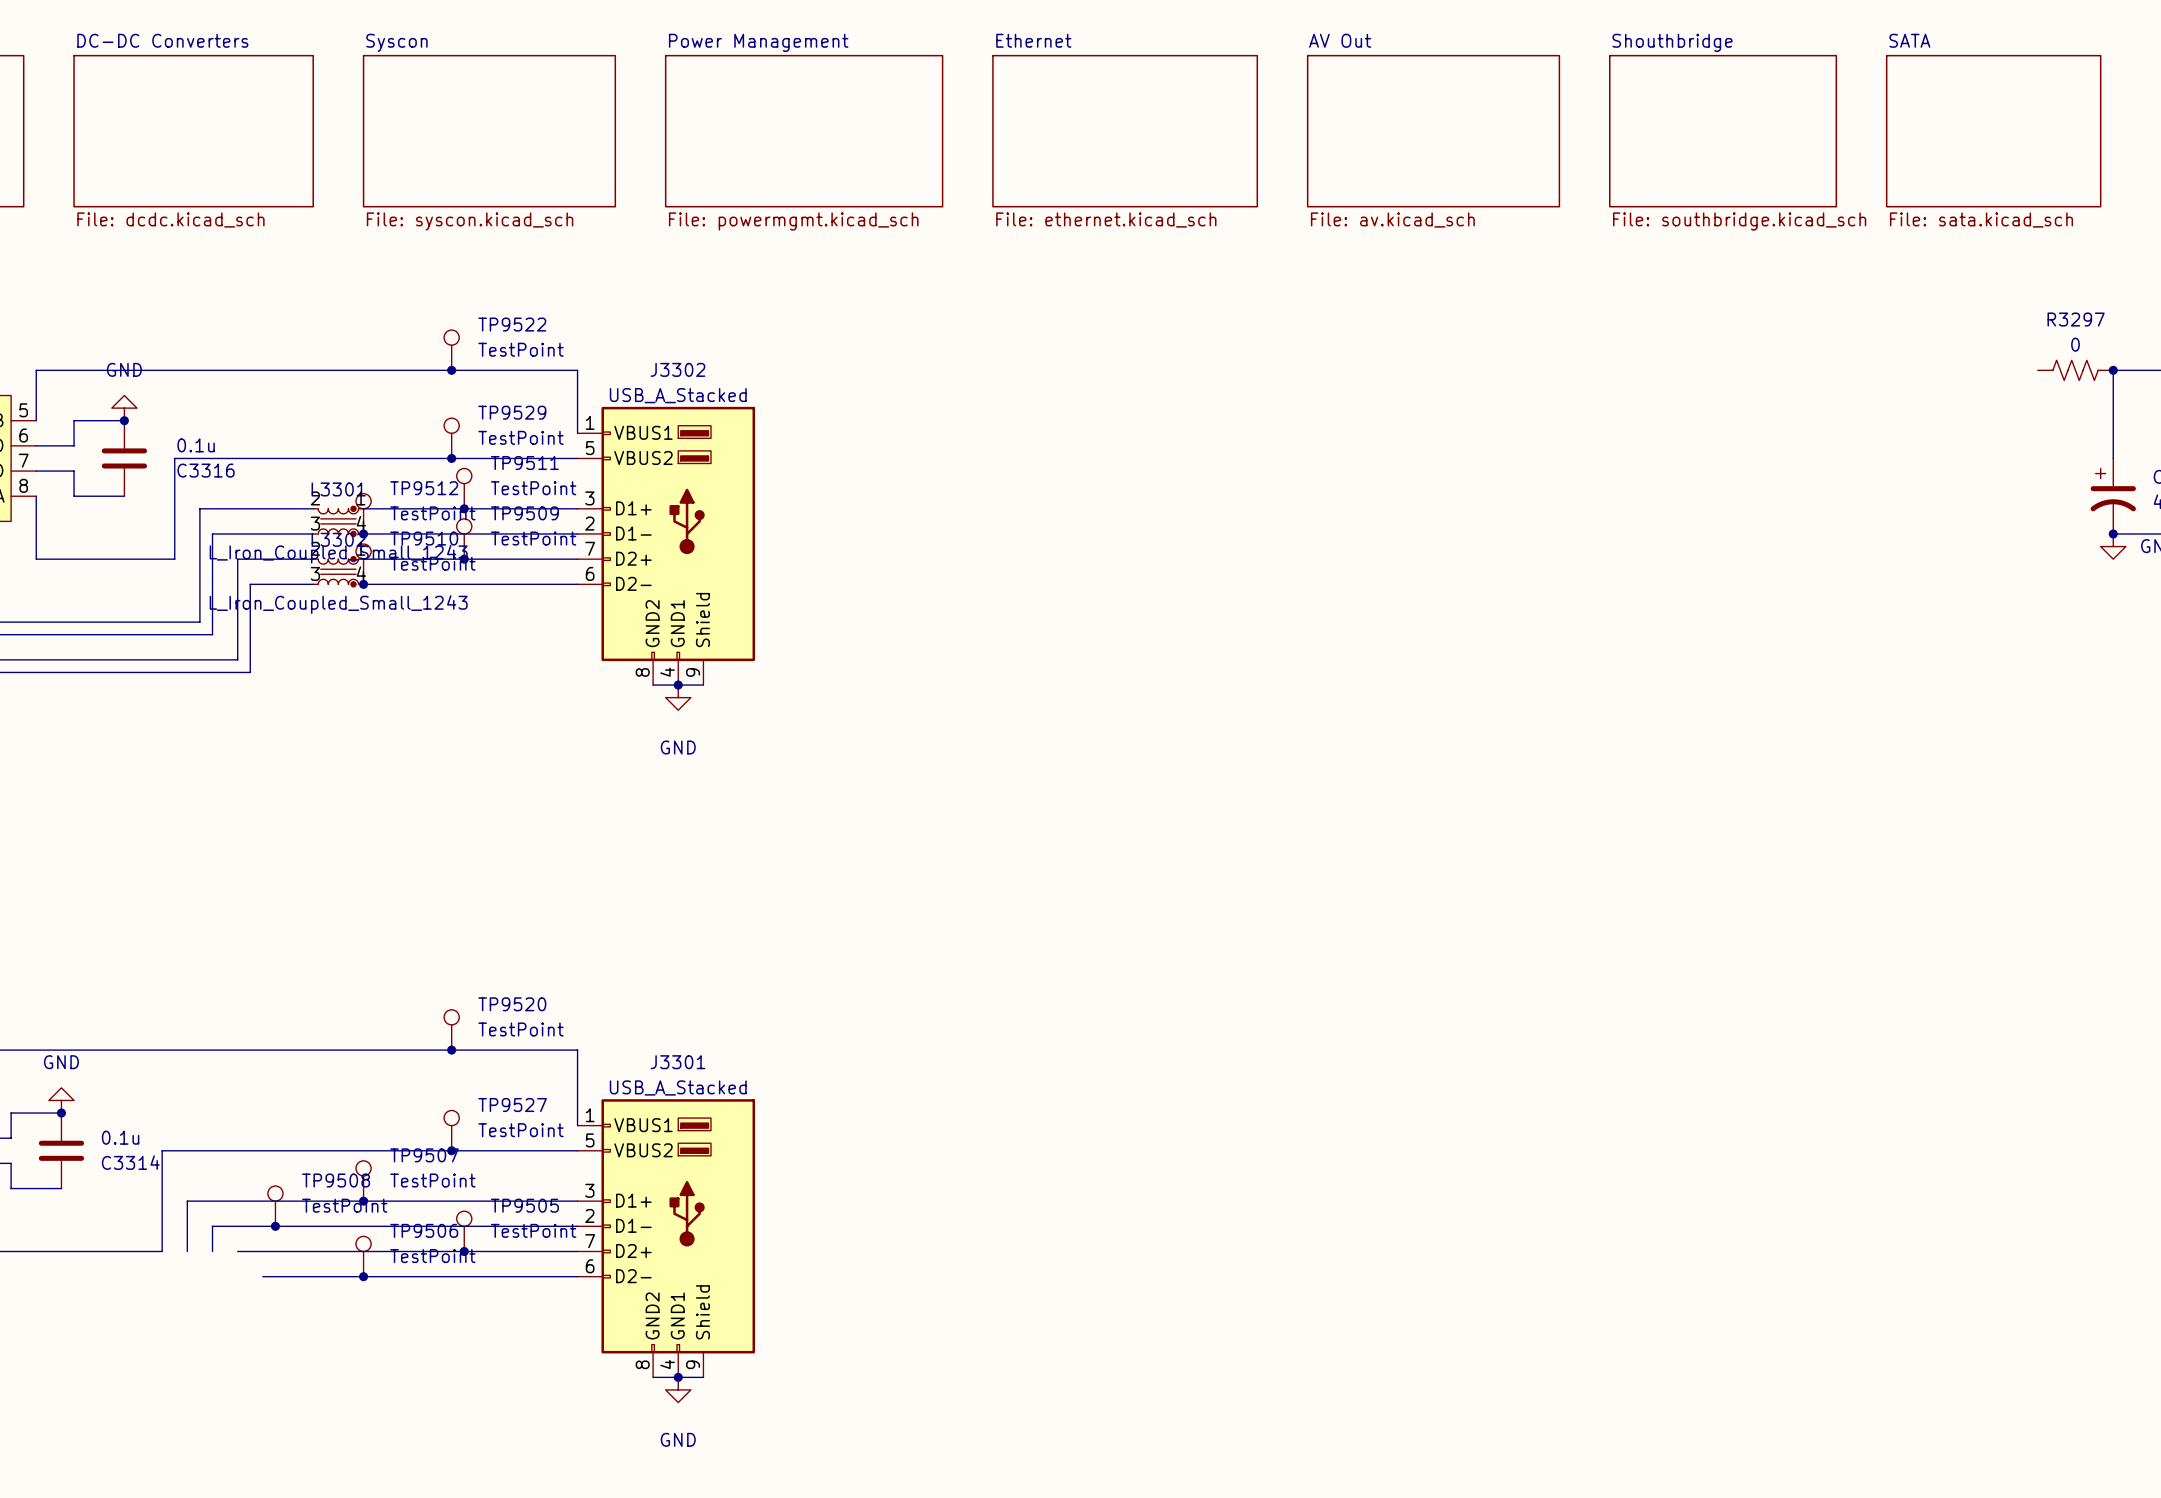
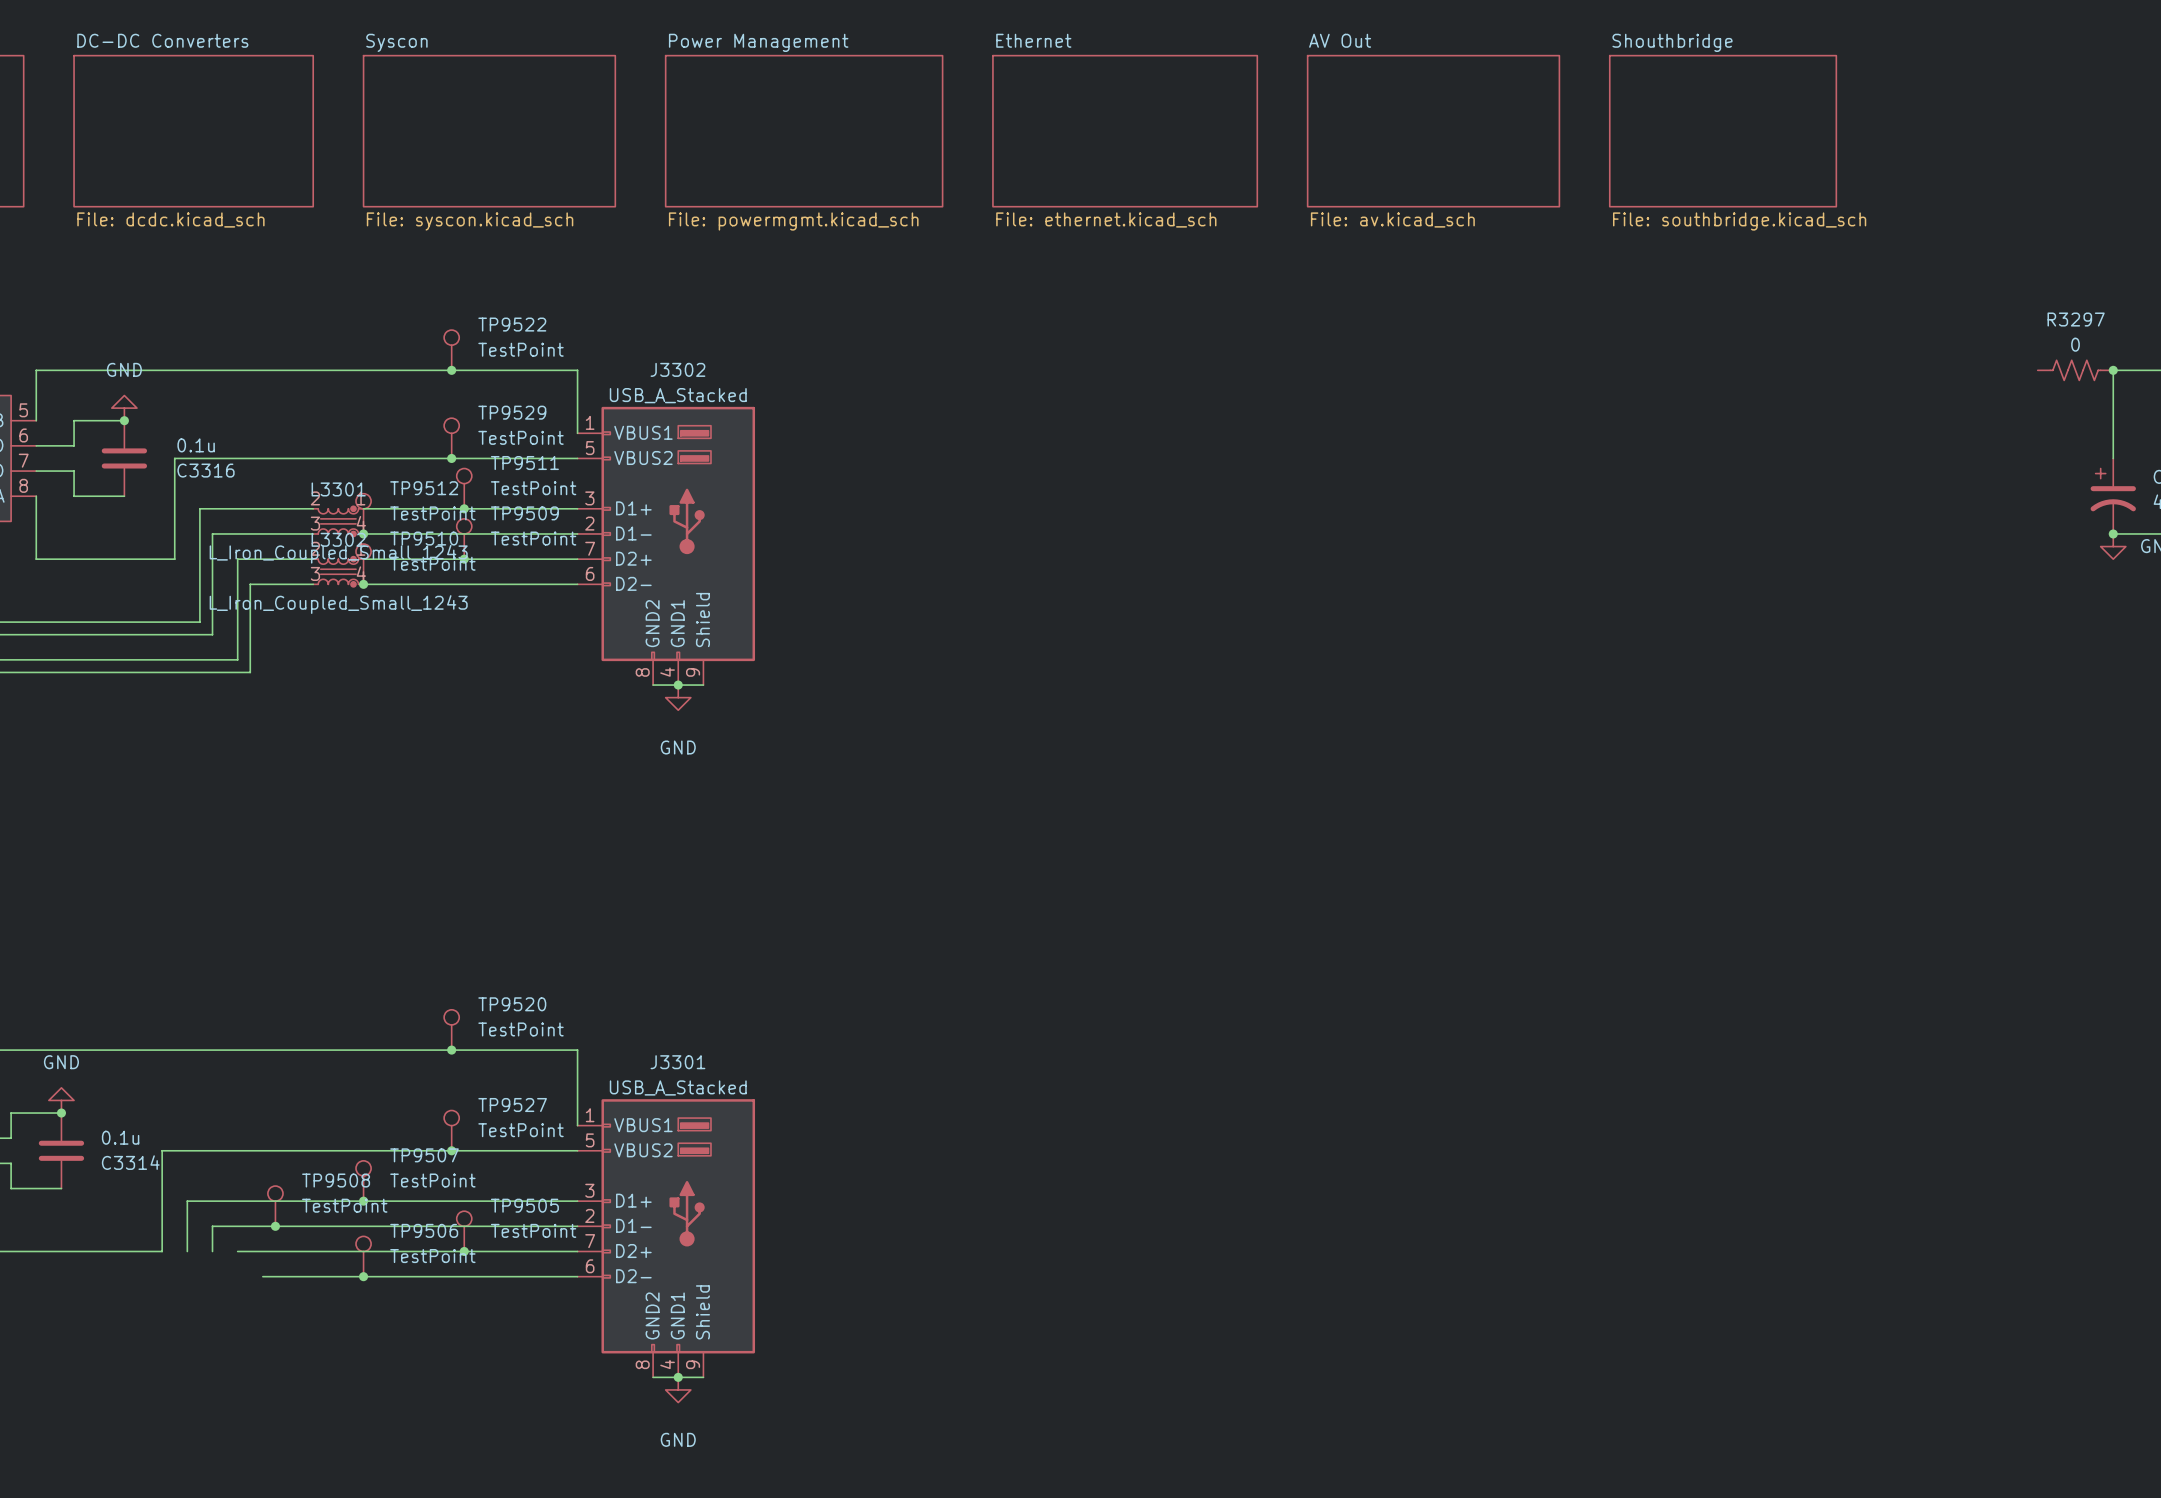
sheet SATA: File: sata.kicad_sch (1993, 131) -> none

